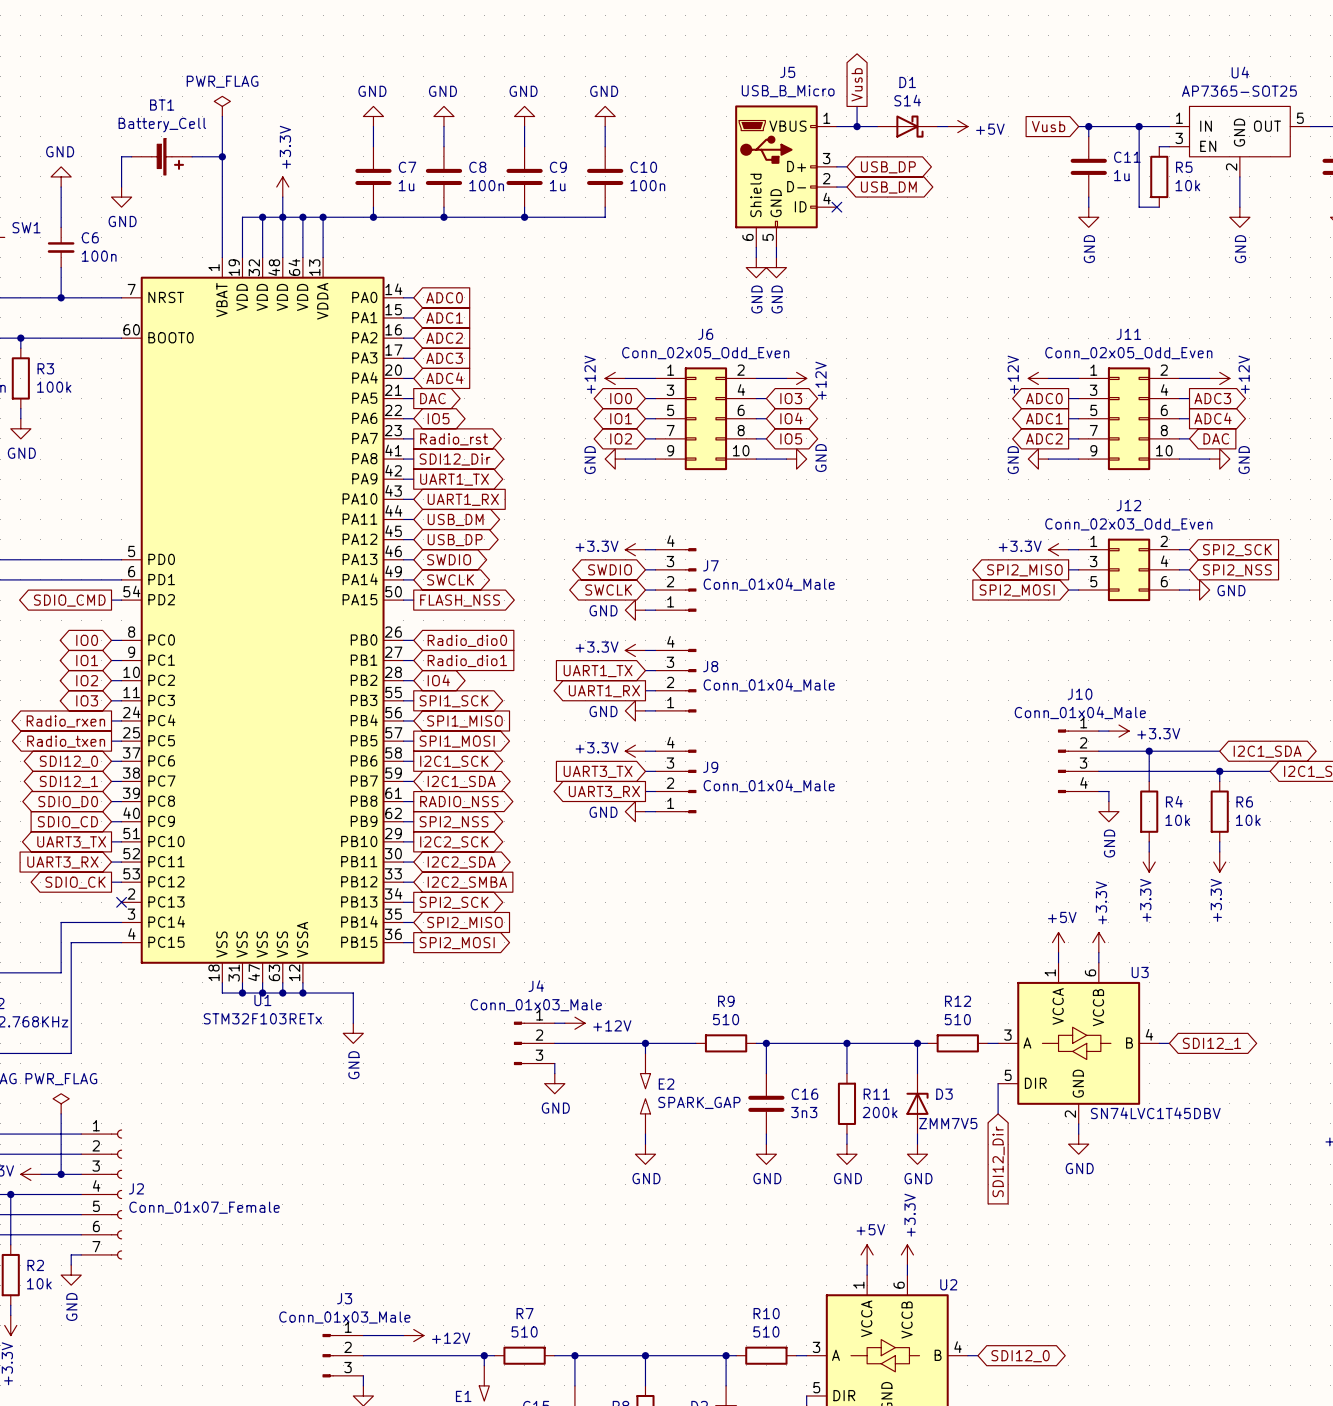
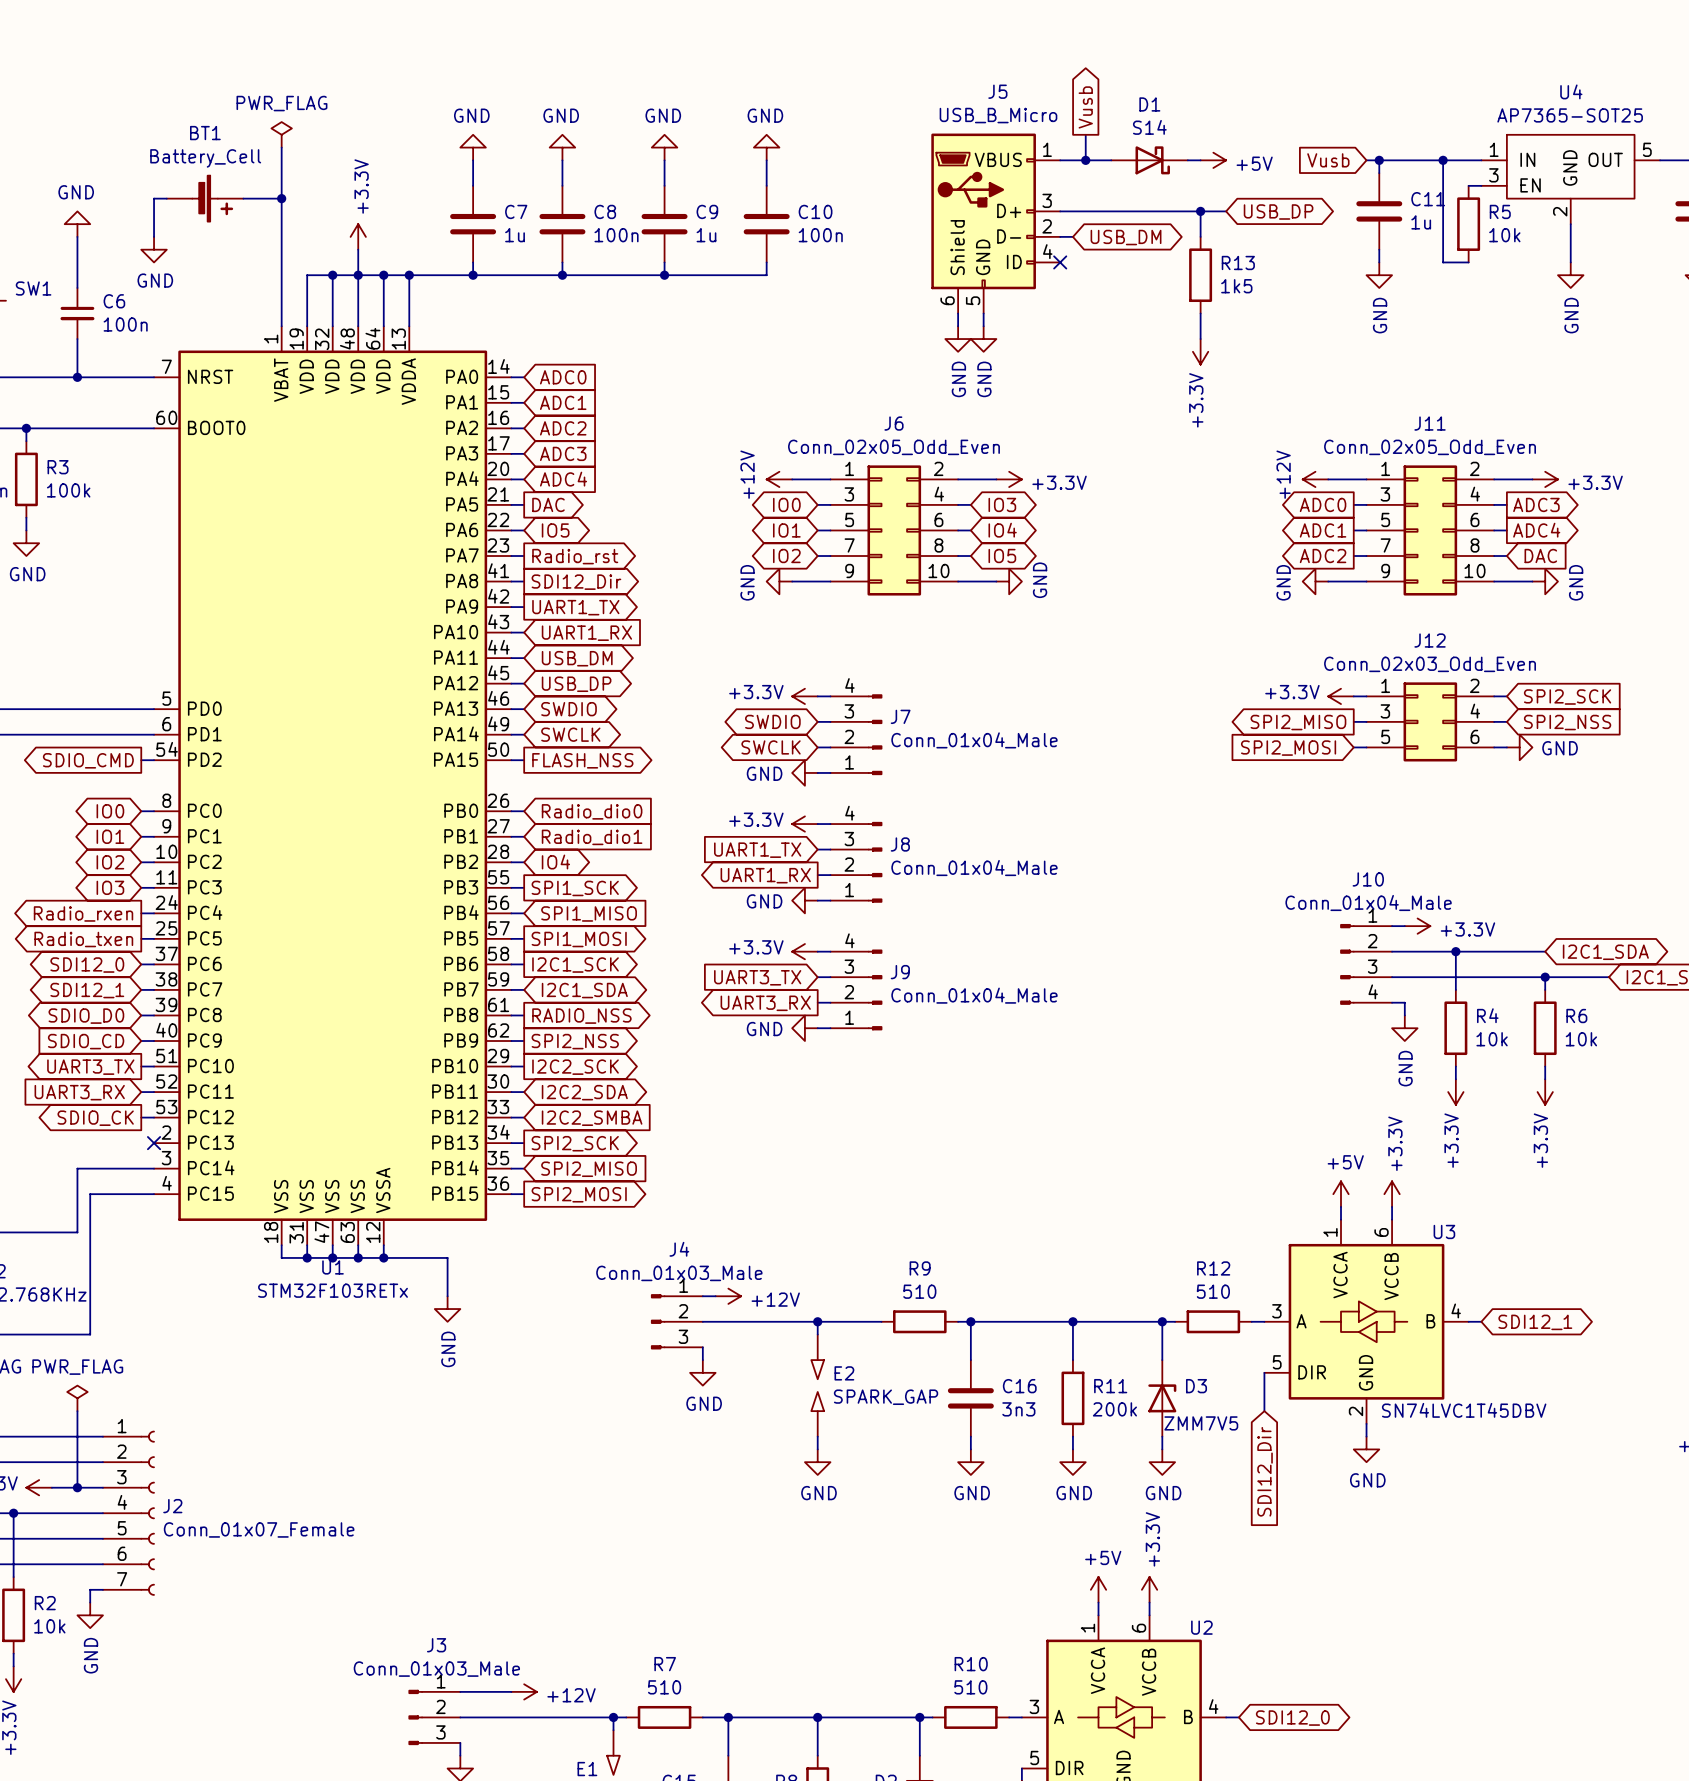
wire: none -> (1072, 211) (1226, 211)
wire: none -> (1200, 211) (1200, 236)
junction: none -> (1200, 211)
global label position: USB_DP (888, 167) -> USB_DP (1278, 212)
R13: none -> 1k5 (1200, 275)
wire: none -> (1200, 313) (1200, 339)
power symbol: none -> +3.3V (1200, 351)
power symbol: +12V (796, 378) -> +3.3V (1009, 479)
power symbol: +12V (1219, 378) -> +3.3V (1545, 479)

